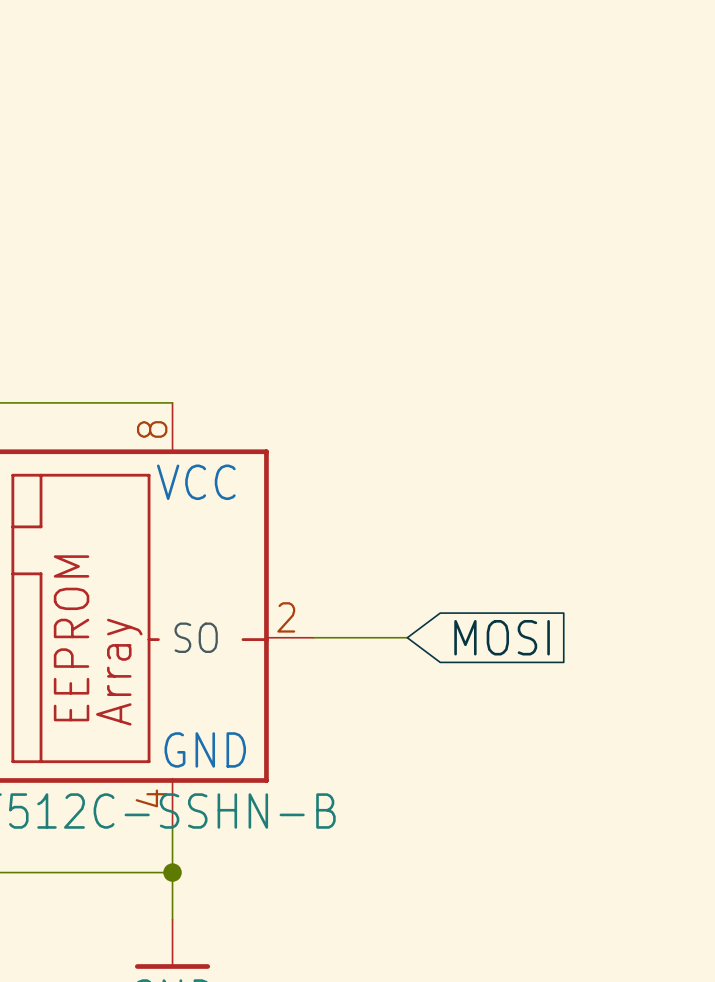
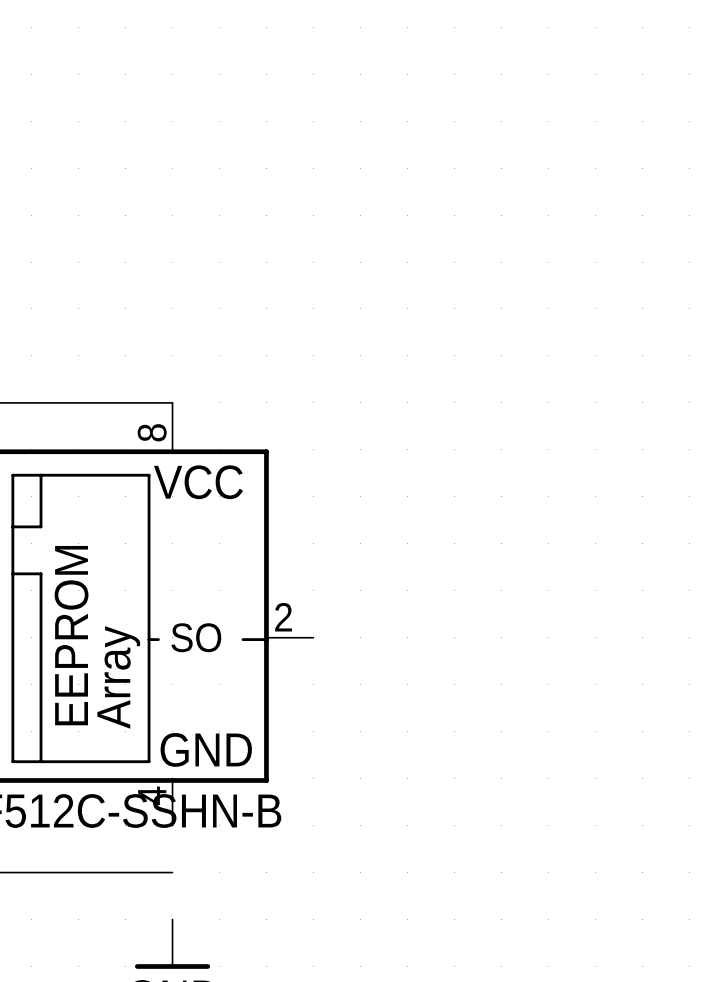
wire: (313, 637) (407, 637) -> none
global label: MOSI (502, 637) -> none
wire: (172, 825) (172, 919) -> none
junction: (172, 872) -> none

